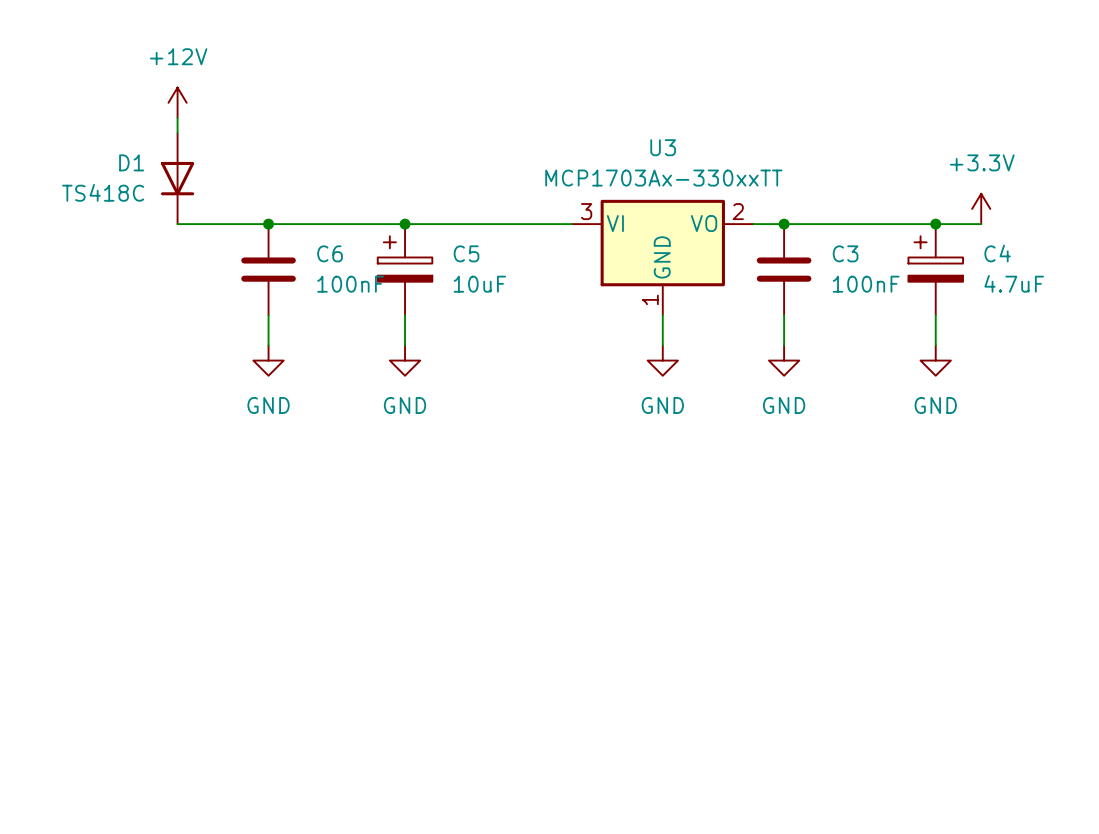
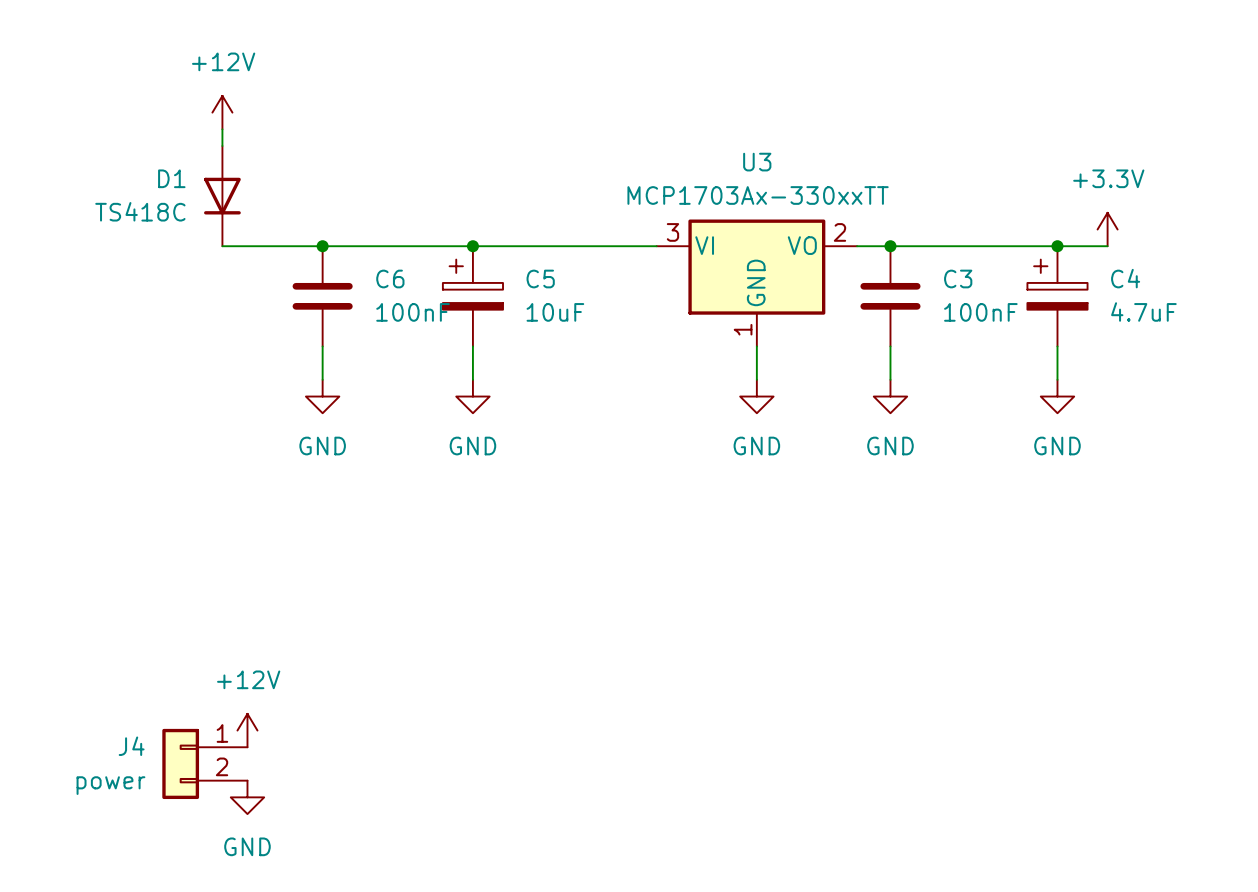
power symbol: none -> +12V (247, 730)
J4: none -> power (204, 763)
power symbol: none -> GND (247, 797)

